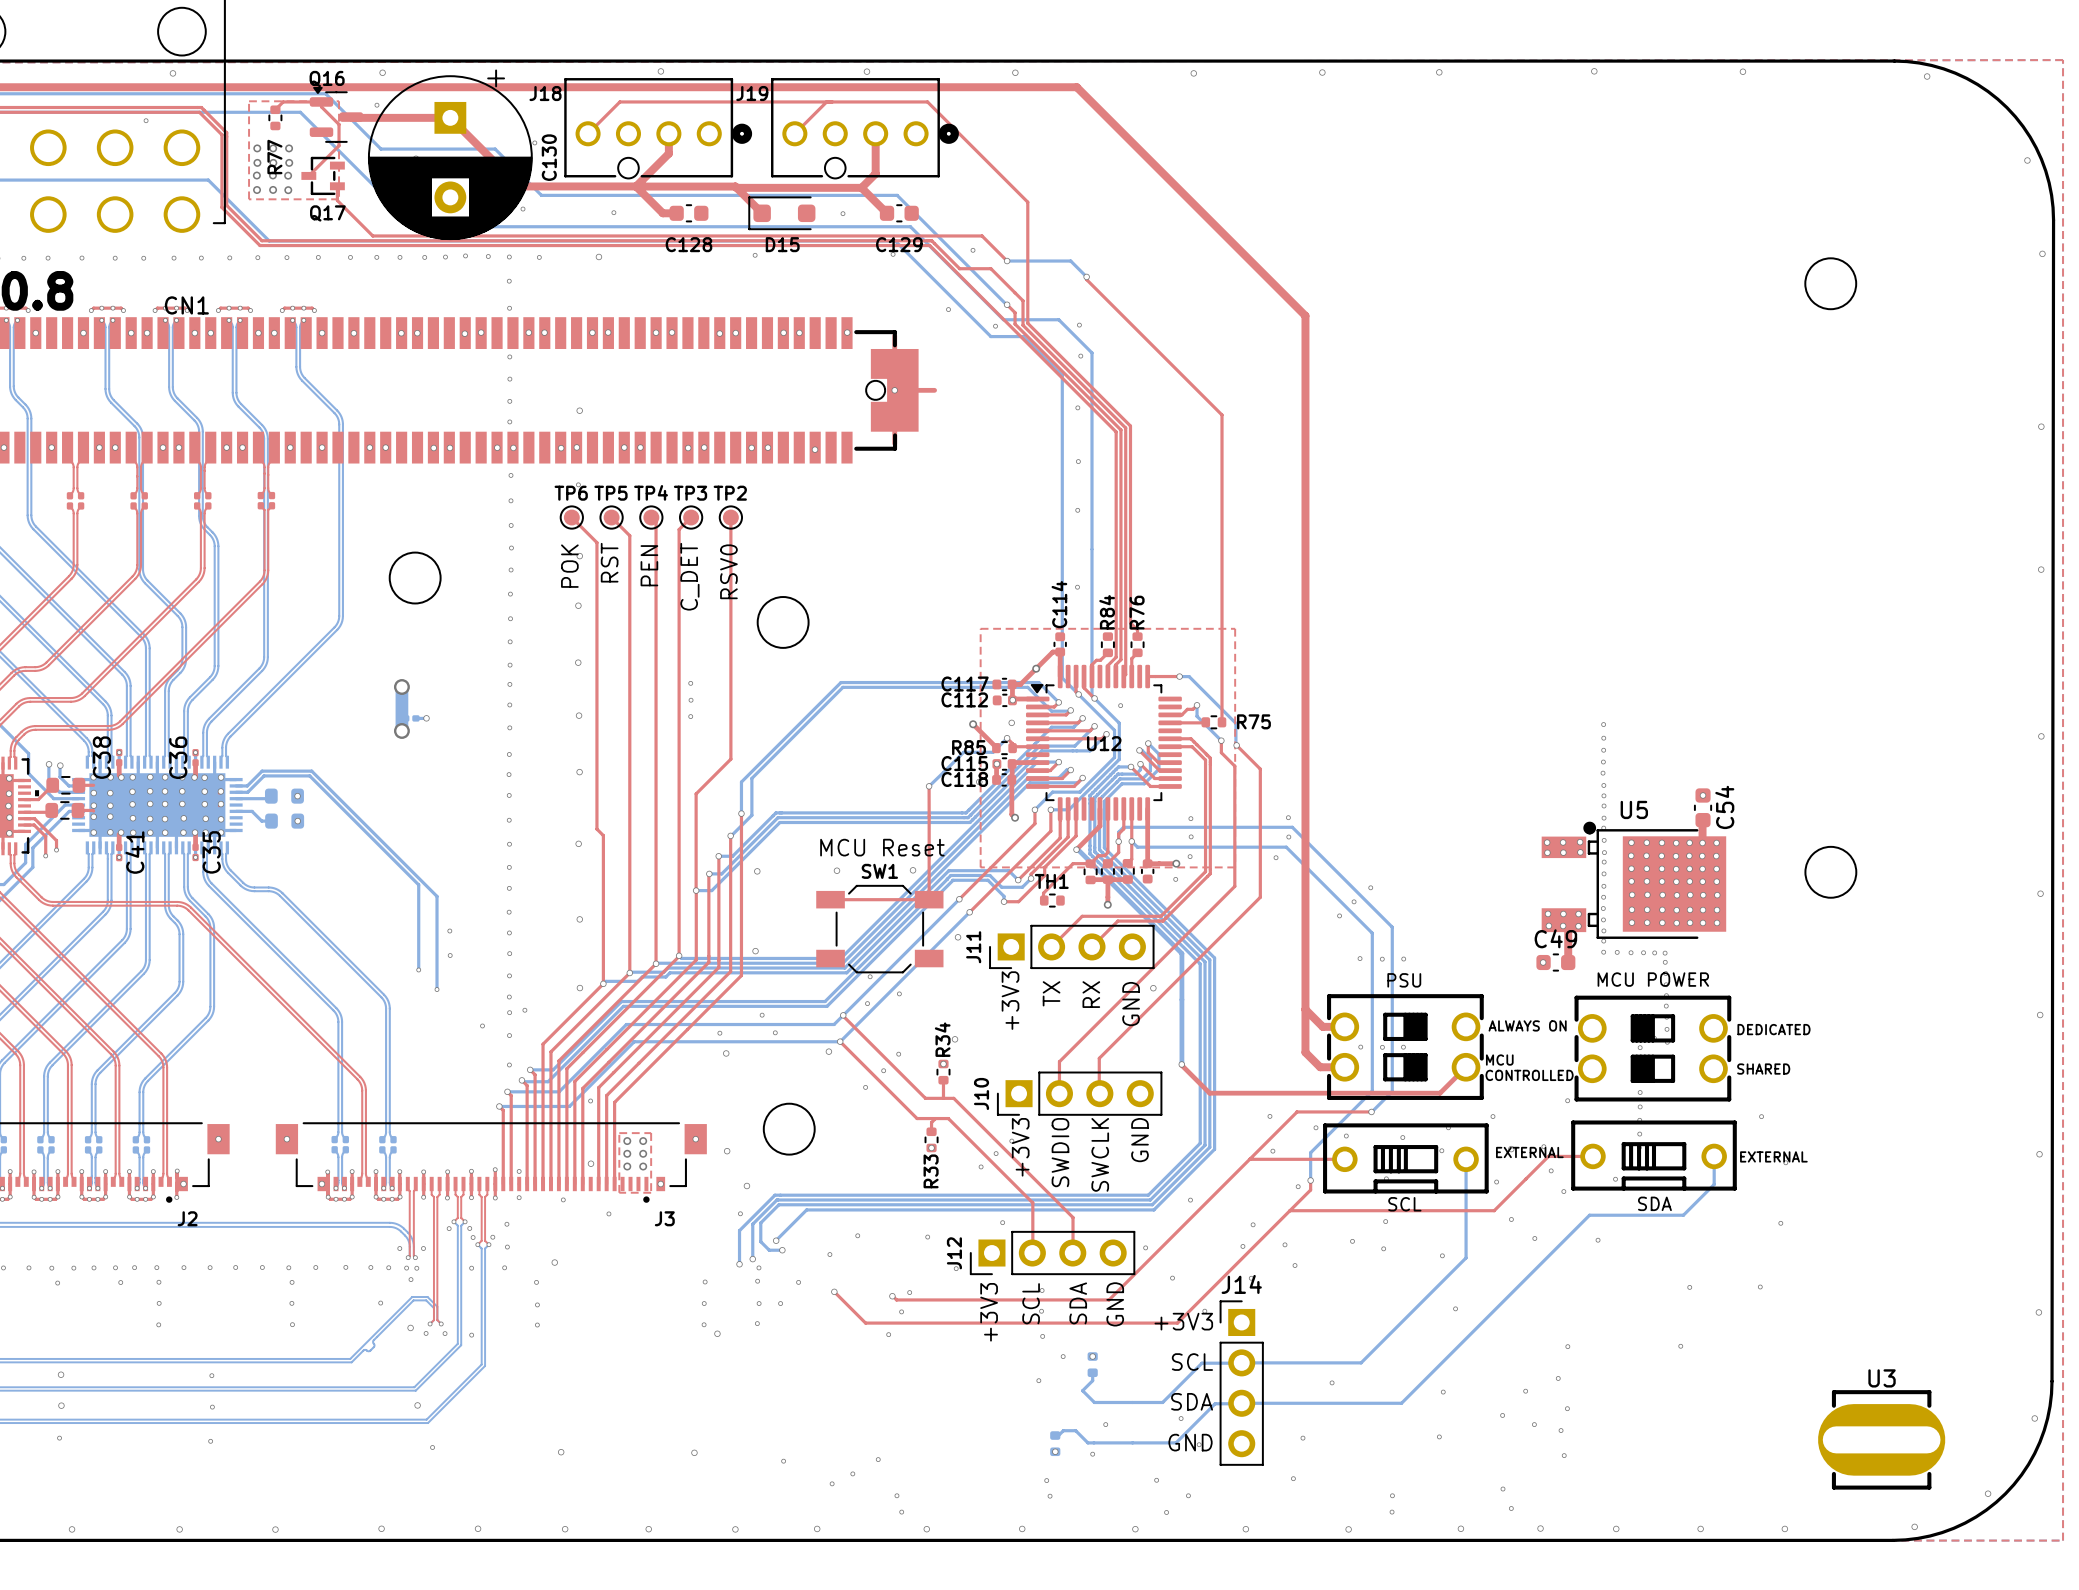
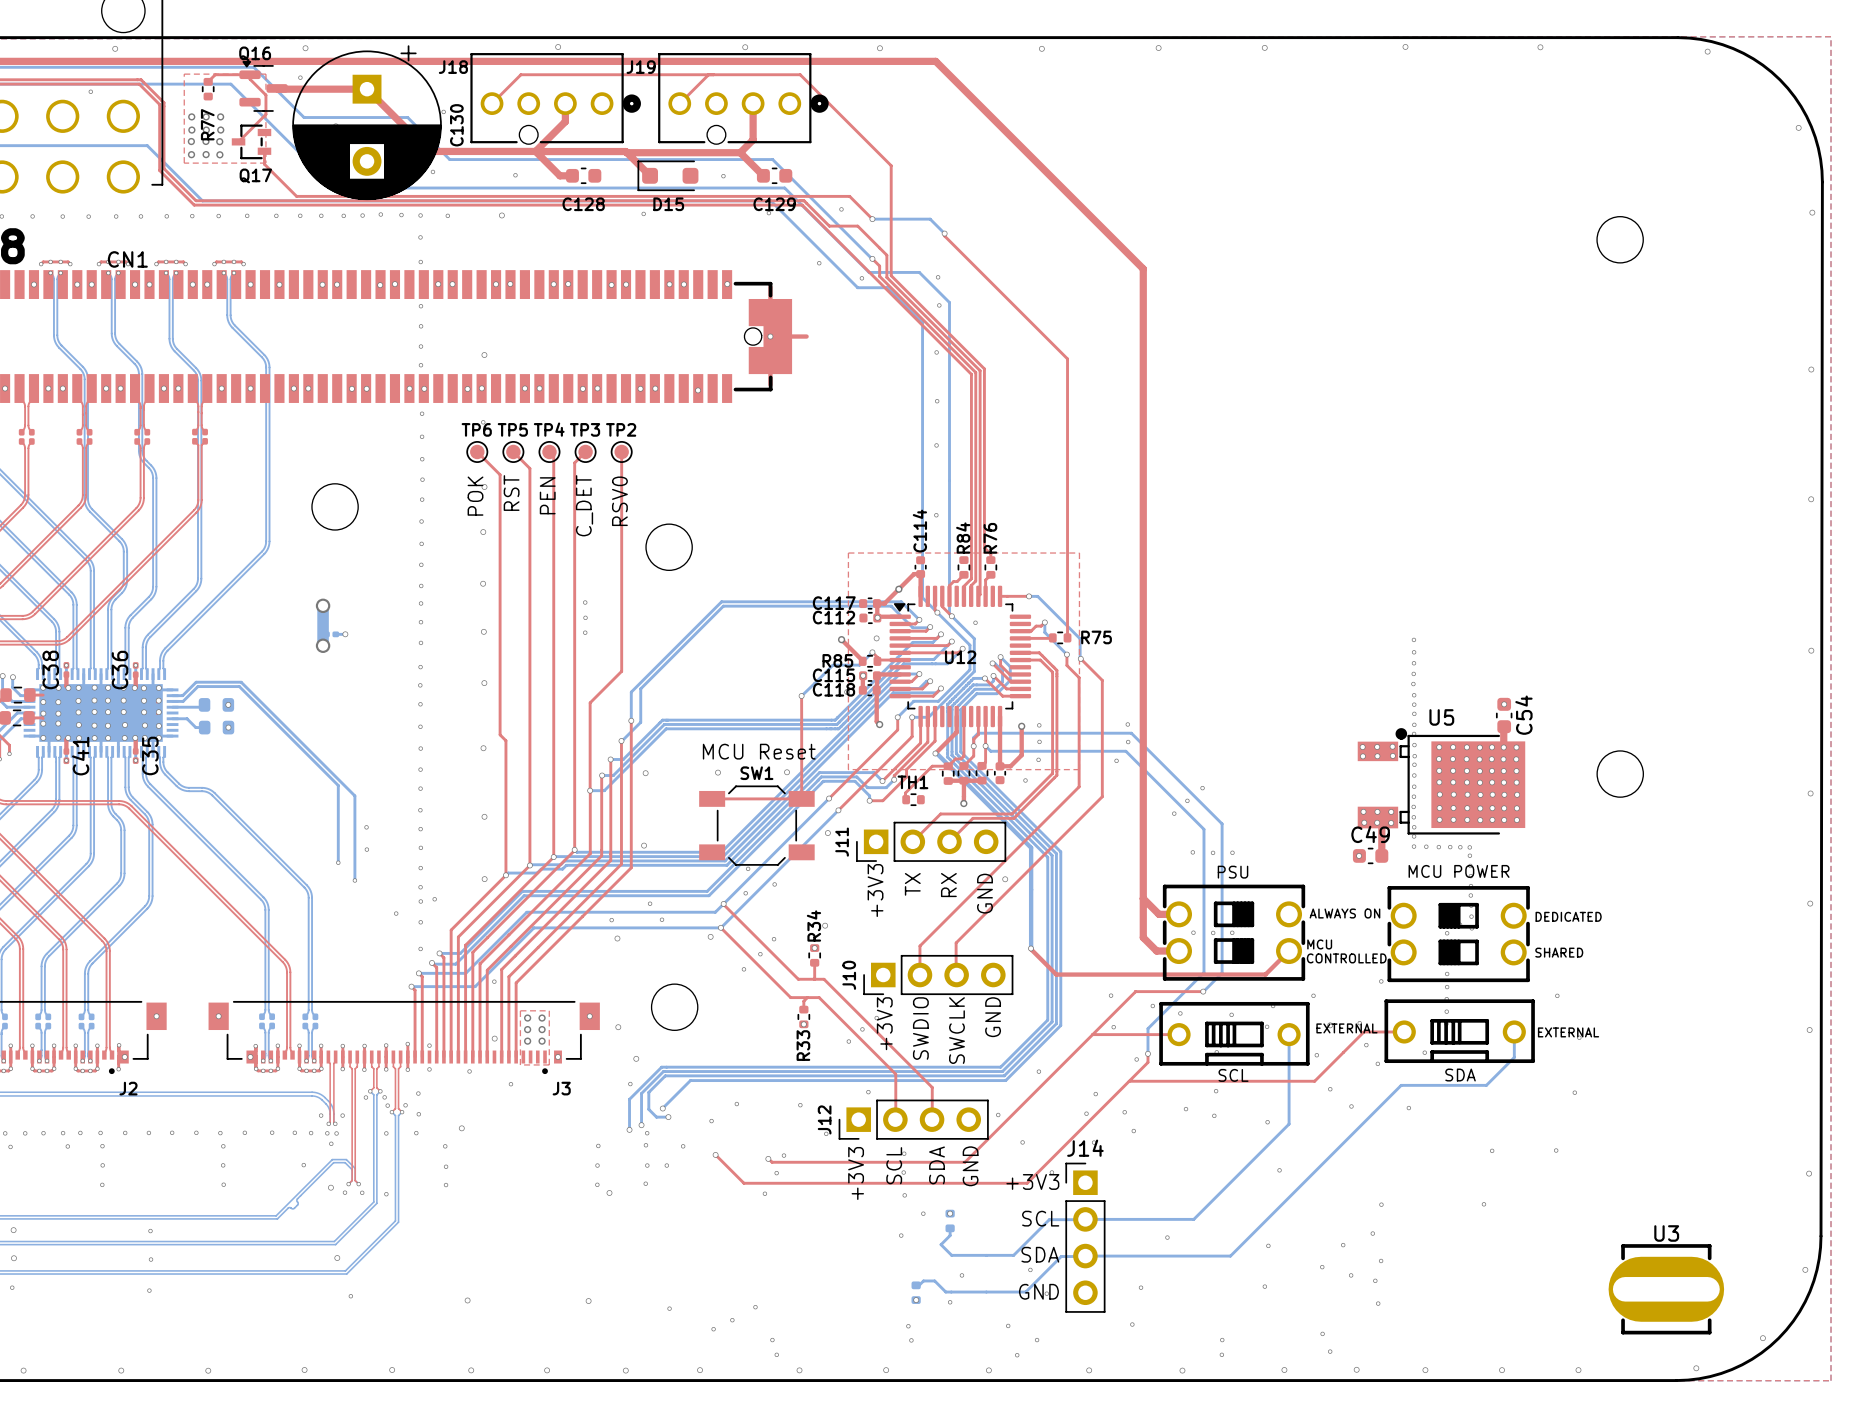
top track: (1159, 863) (1176, 863) -> (1010, 766) (1021, 755) (1021, 726)
via position: (1176, 863) -> (1021, 726)

